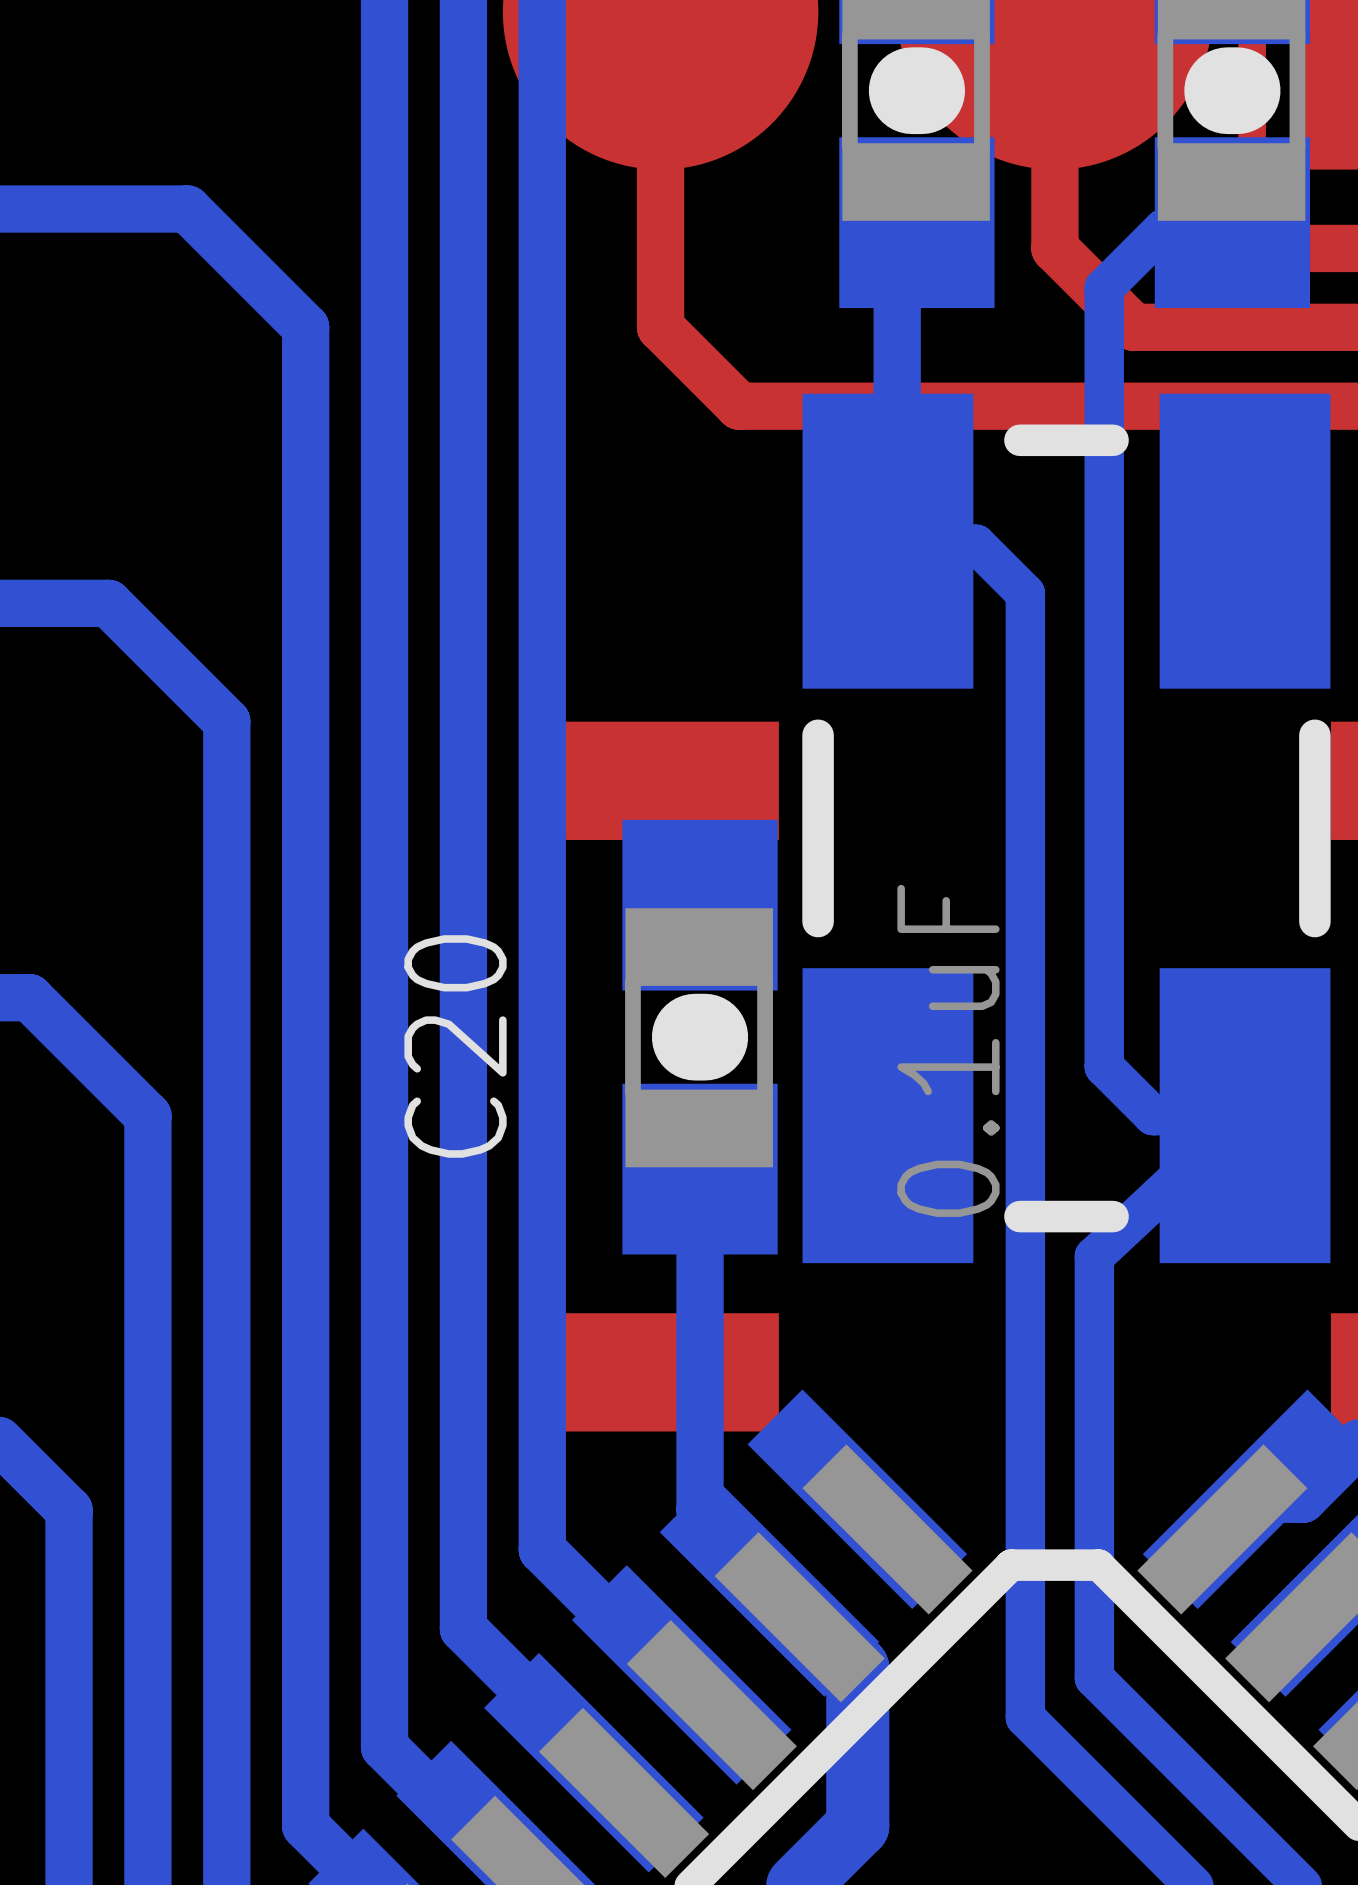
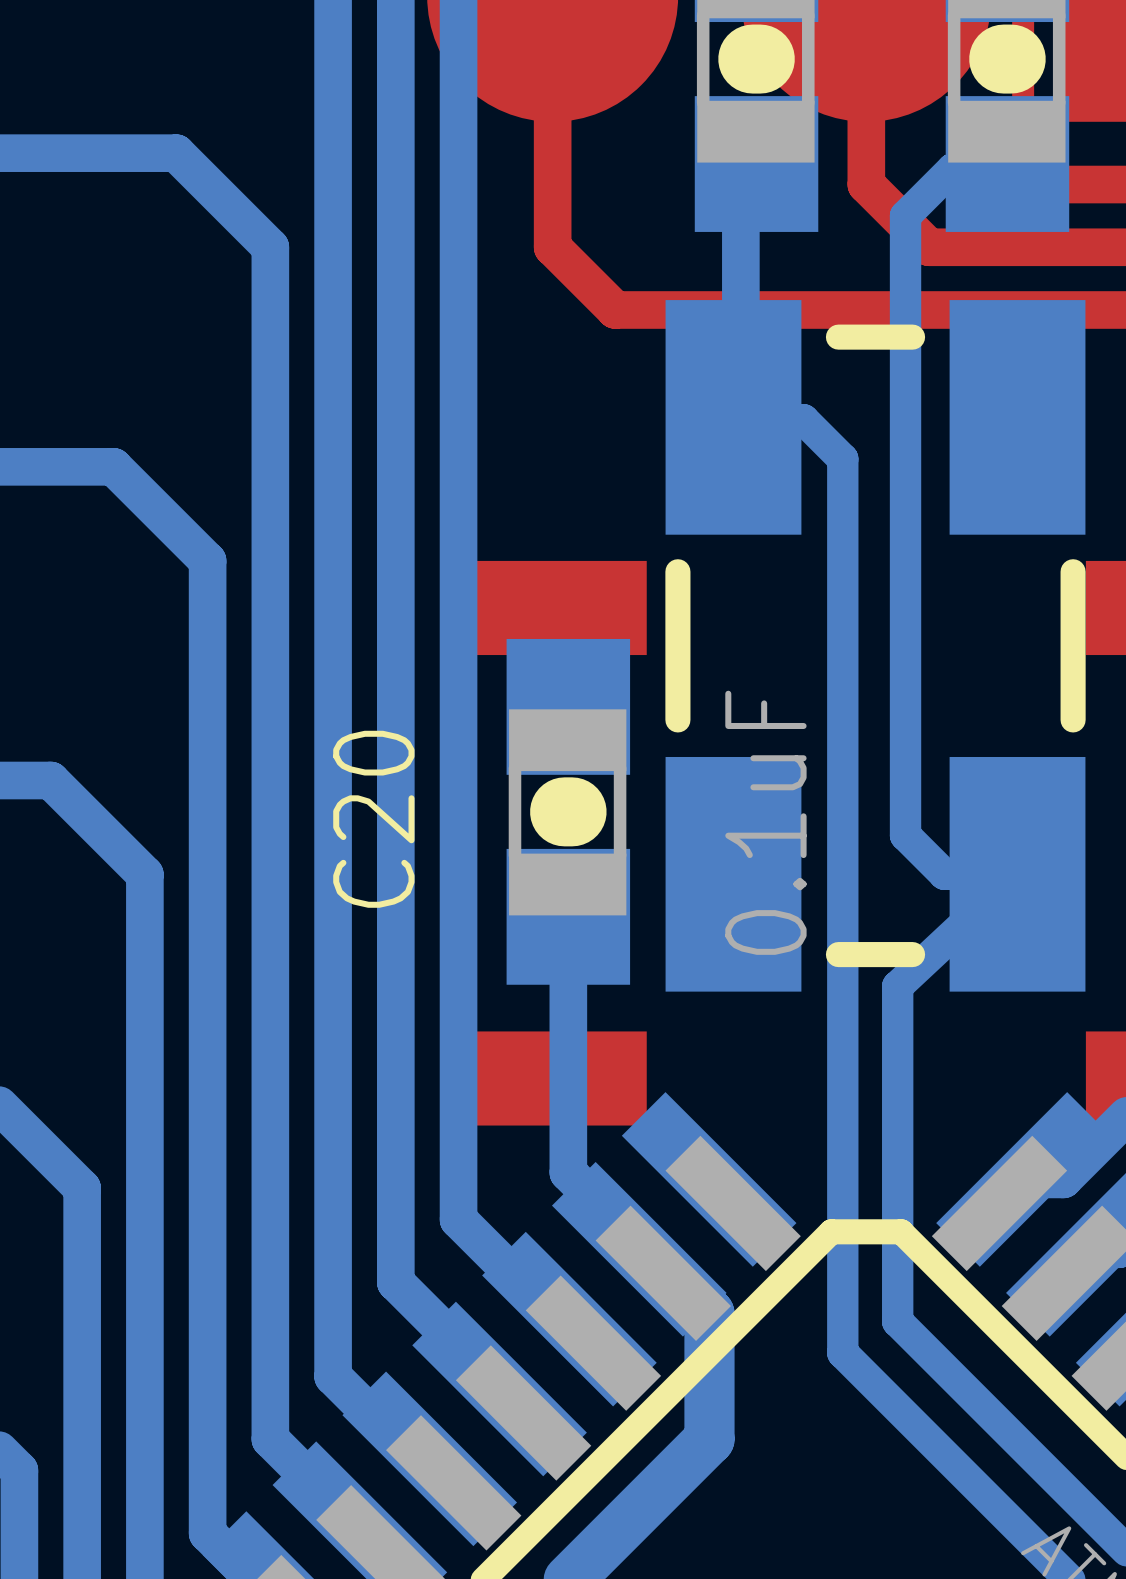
C20 position: (700, 1037) -> (568, 811)
bottom track: (700, 1169) (700, 1510) -> (568, 916) (568, 1172) (584, 1188)

